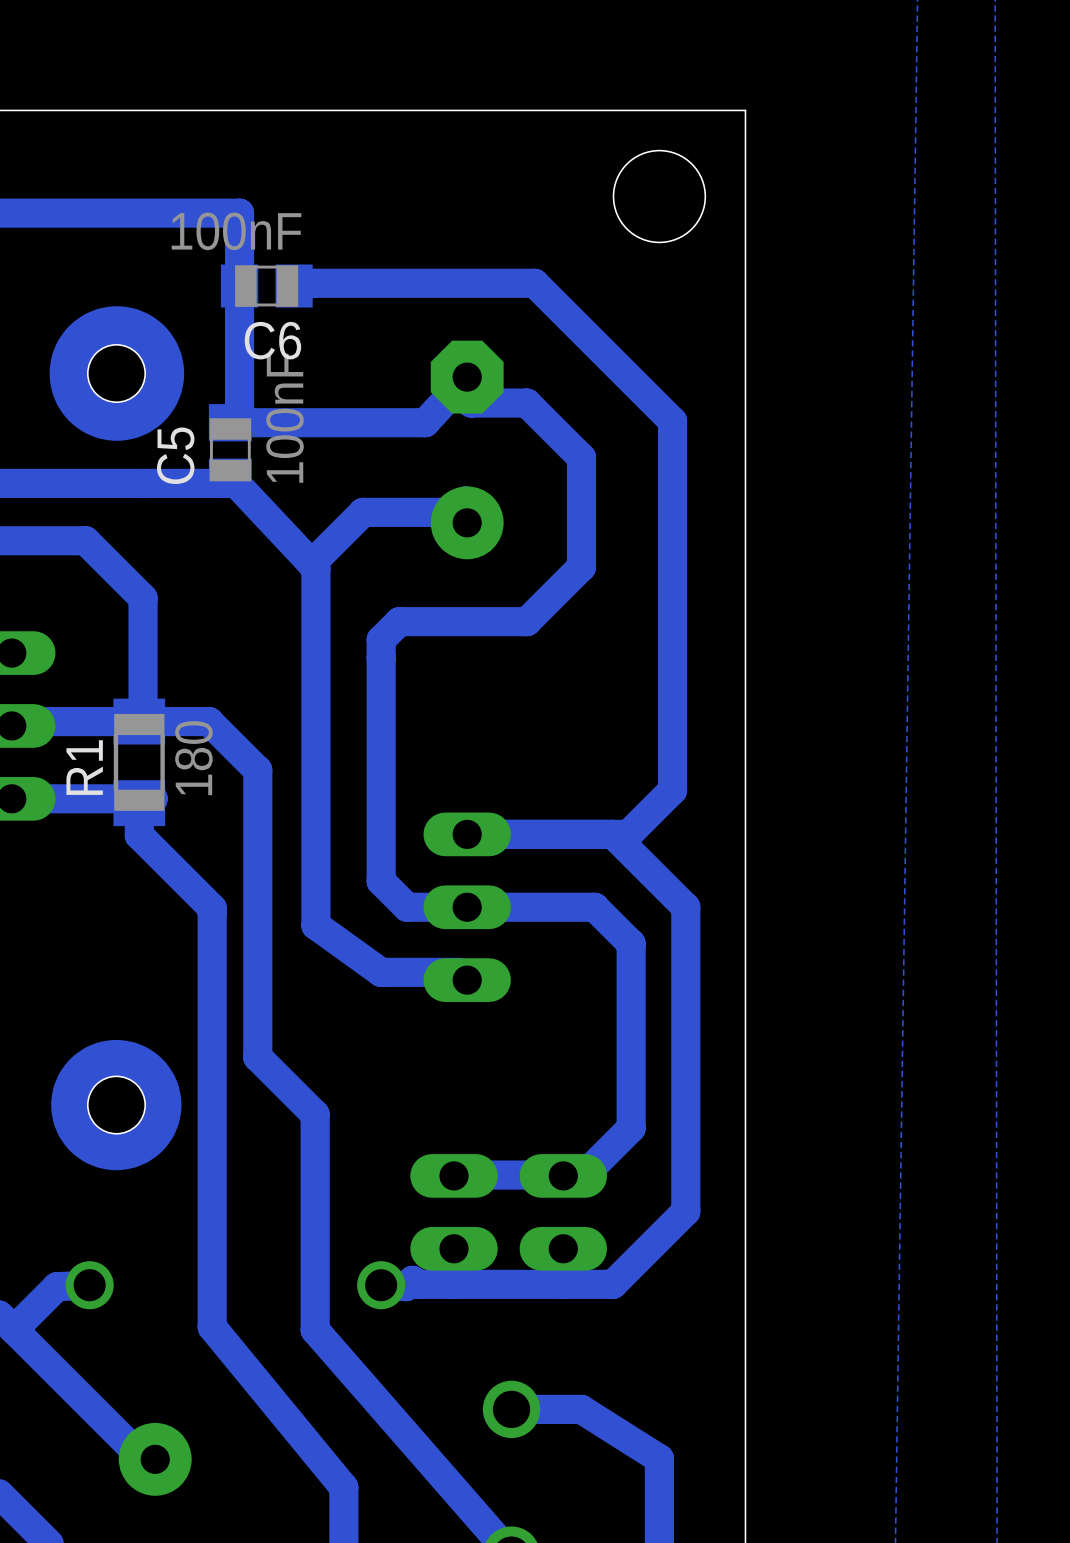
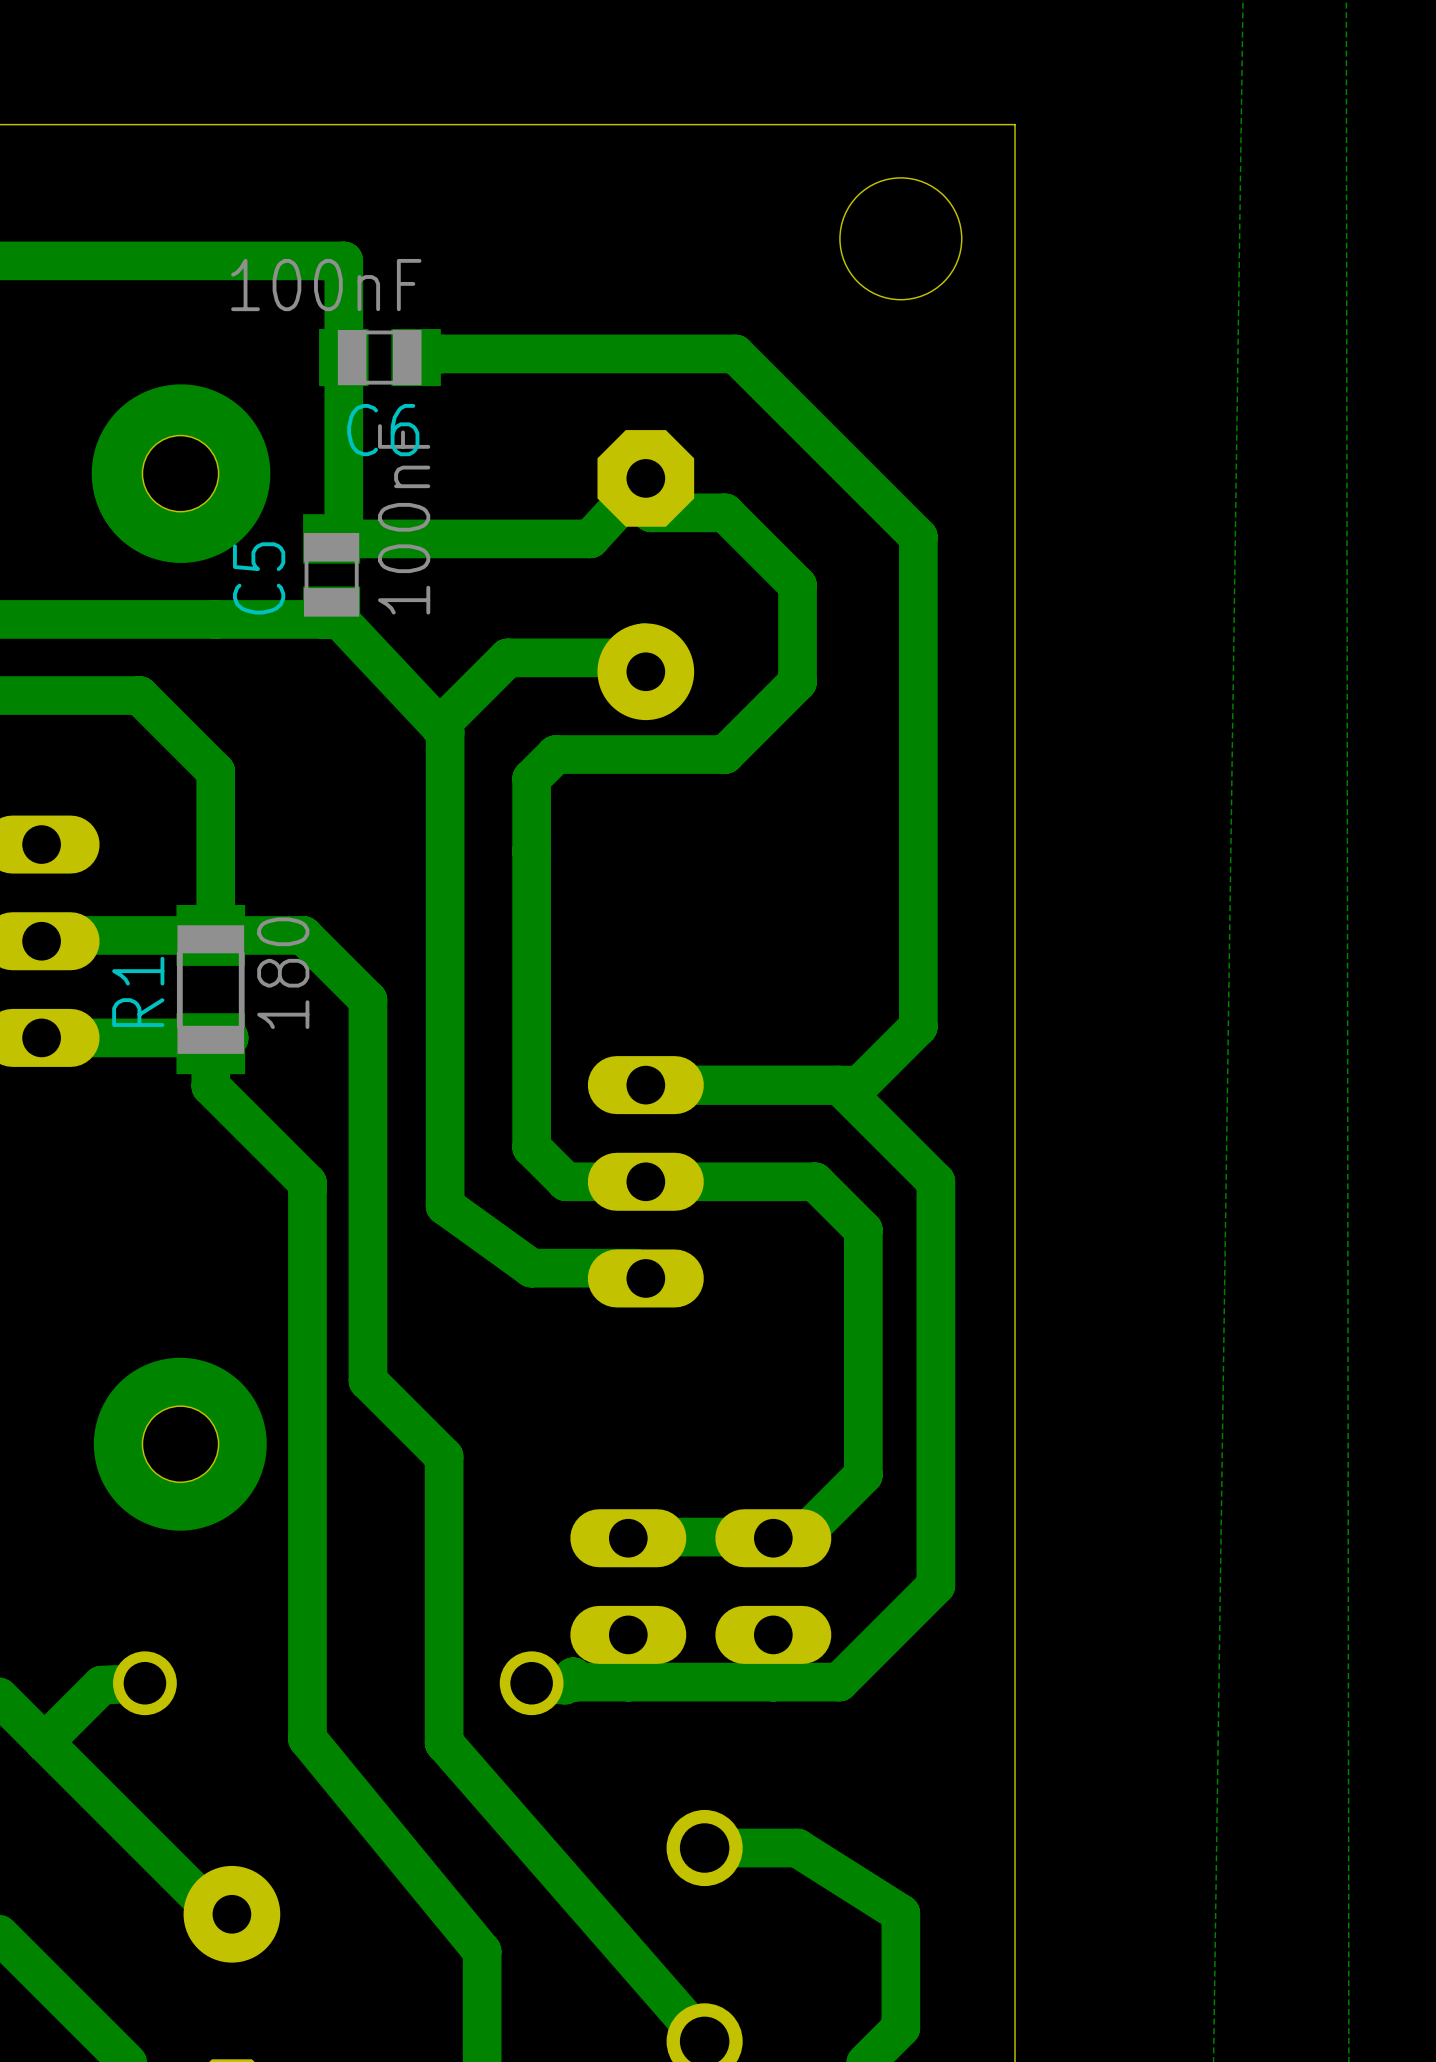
track: (581, 530) (581, 567) (526, 621) (399, 621) (381, 639) -> (797, 682) (725, 754) (555, 754) (531, 778) (531, 827)

